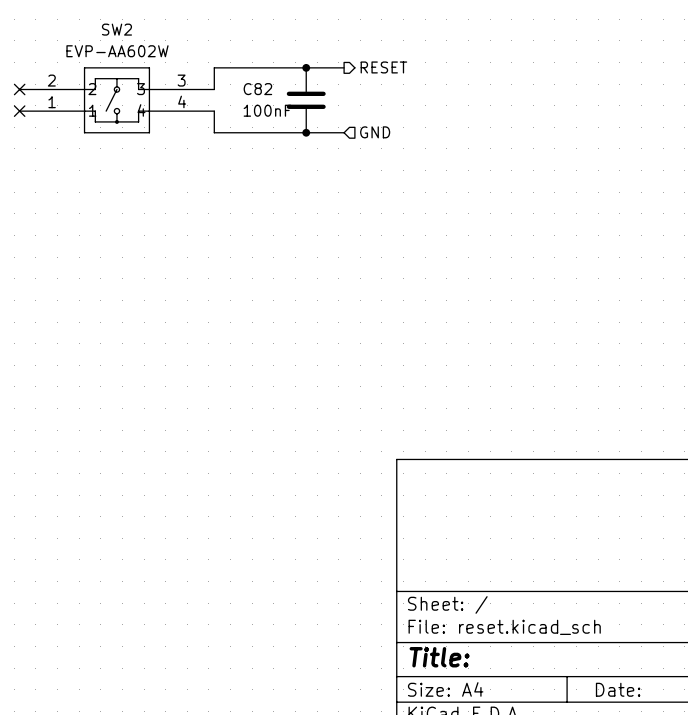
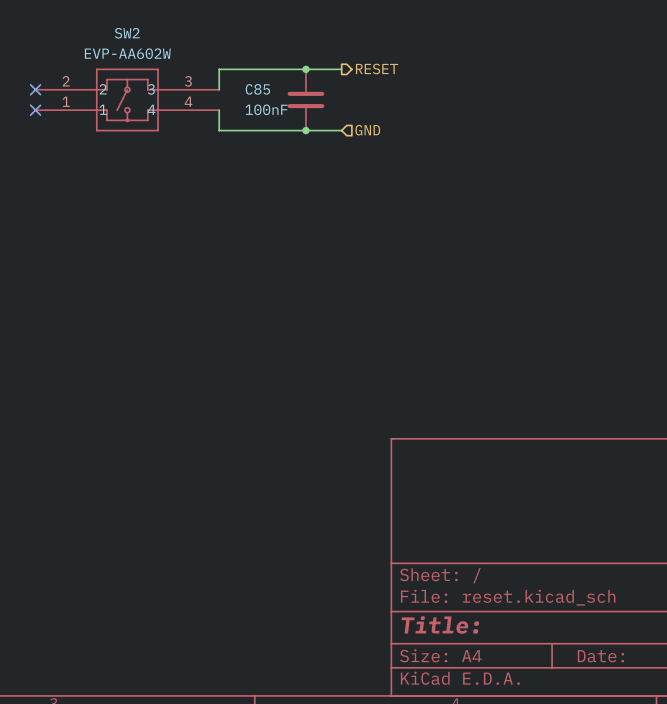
C82 name: C82 (257, 89) -> C85 (257, 89)

